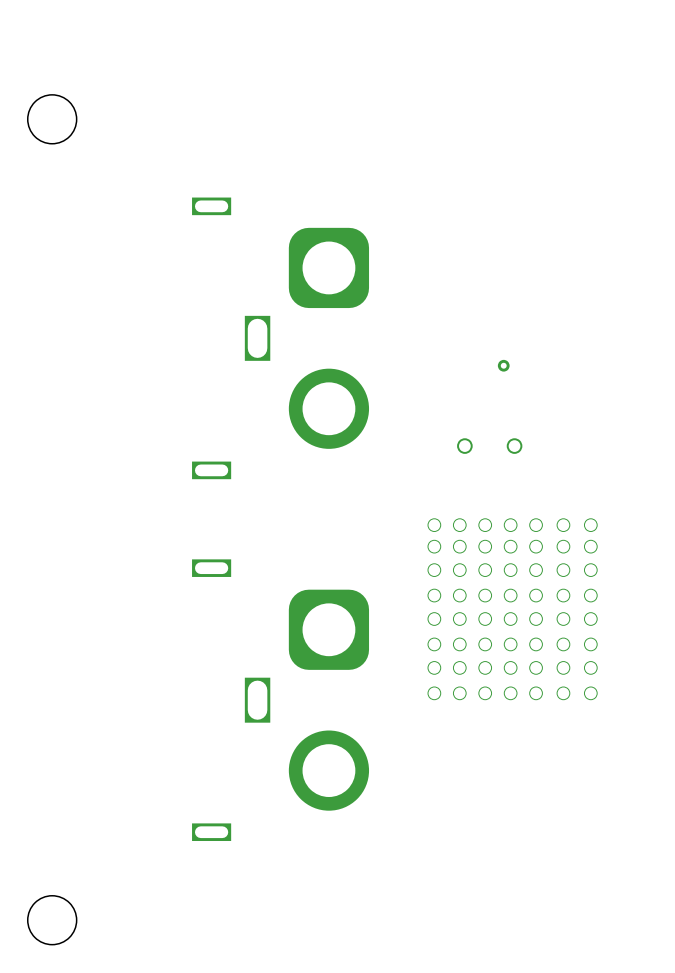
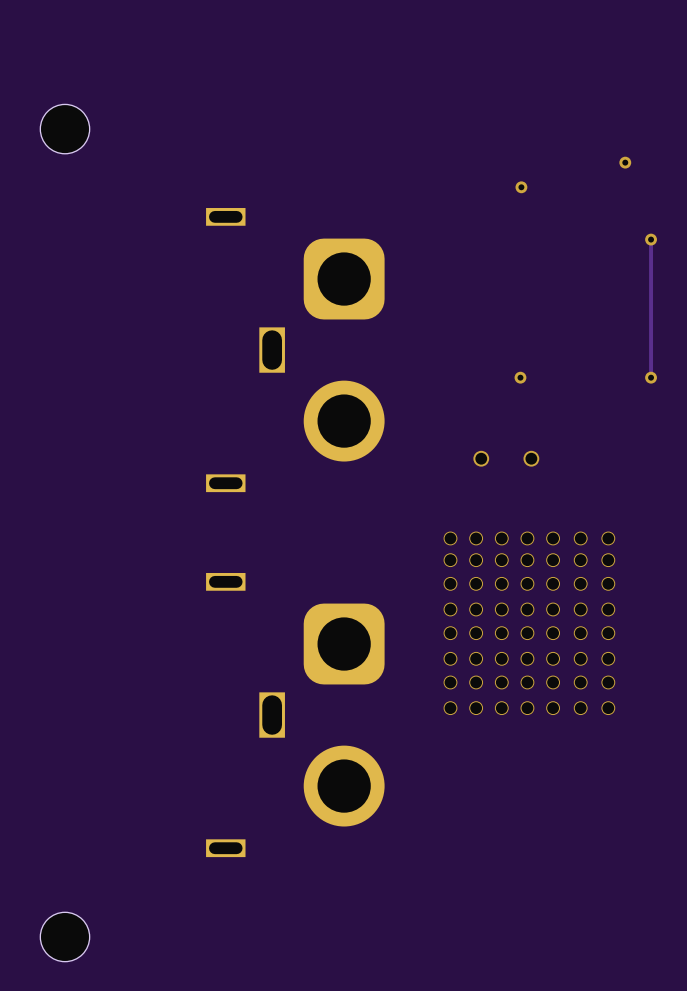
via: none -> (625, 162)
via: none -> (521, 187)
track: none -> (651, 239) (651, 377)
via: none -> (651, 239)
via: none -> (651, 377)

